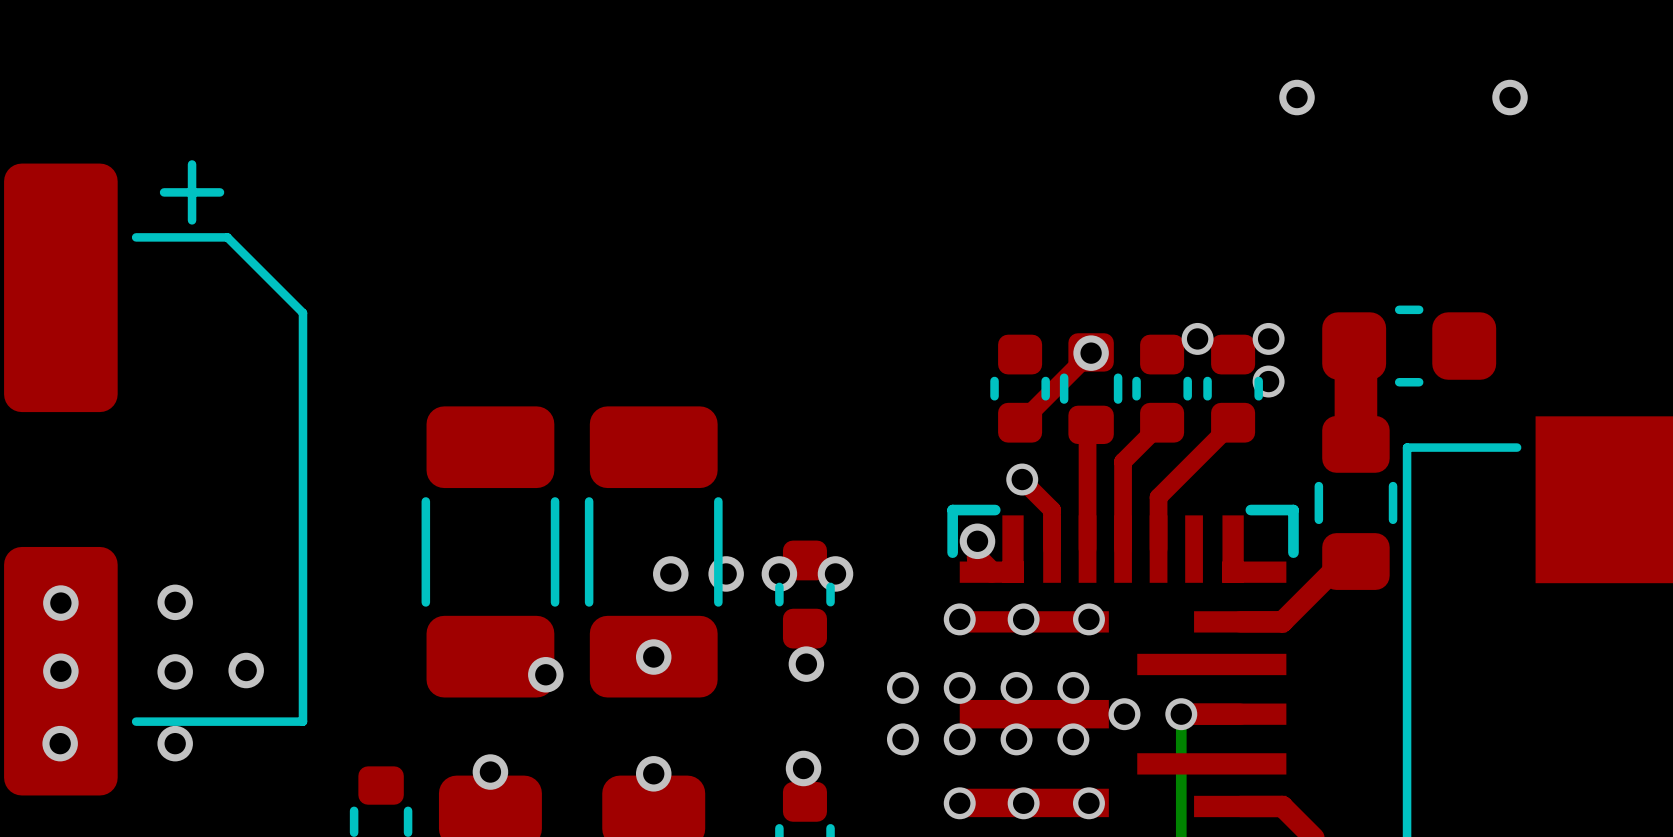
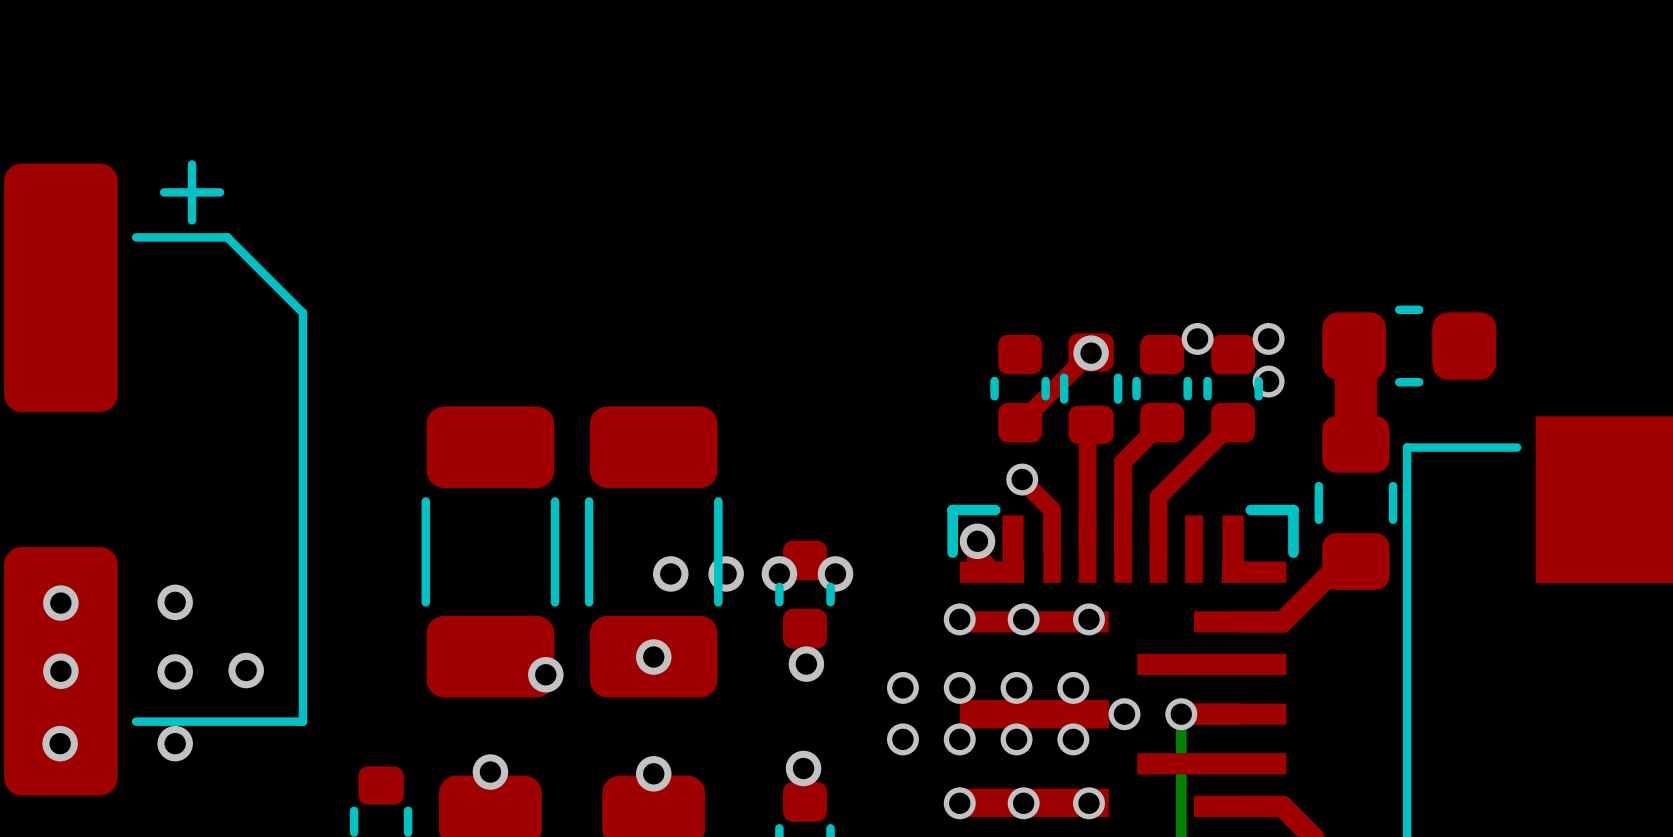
via: (1297, 97) -> none
via: (1510, 97) -> none

